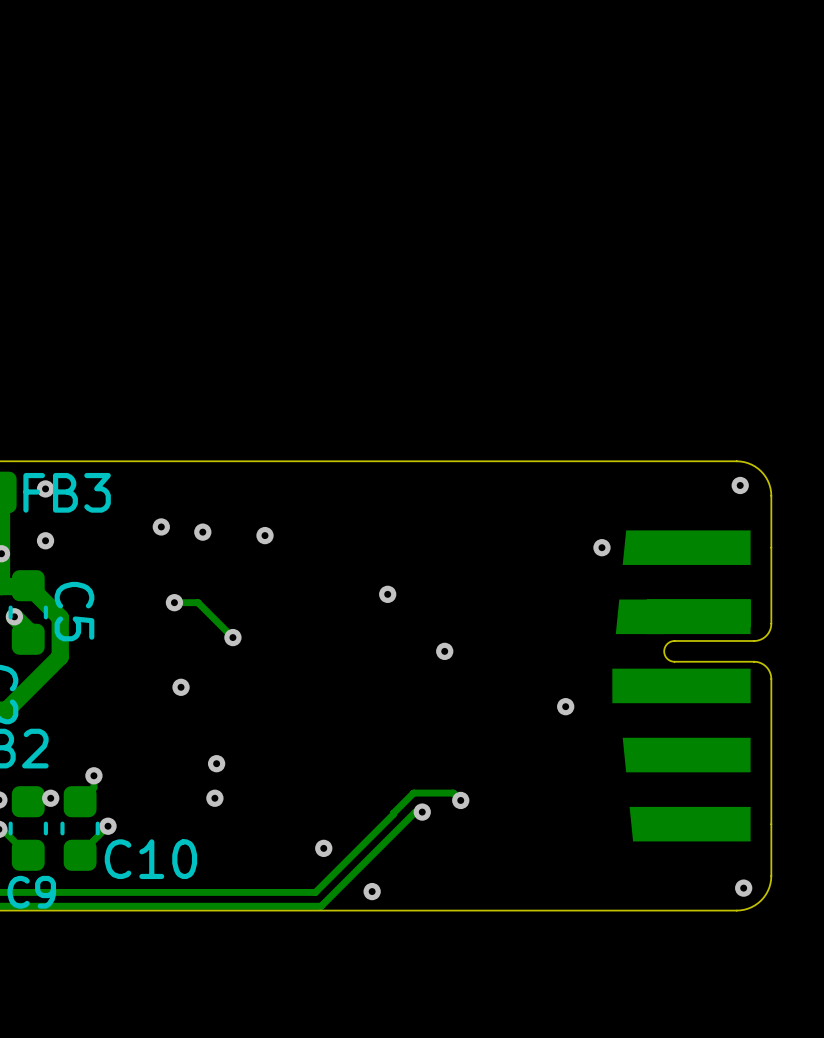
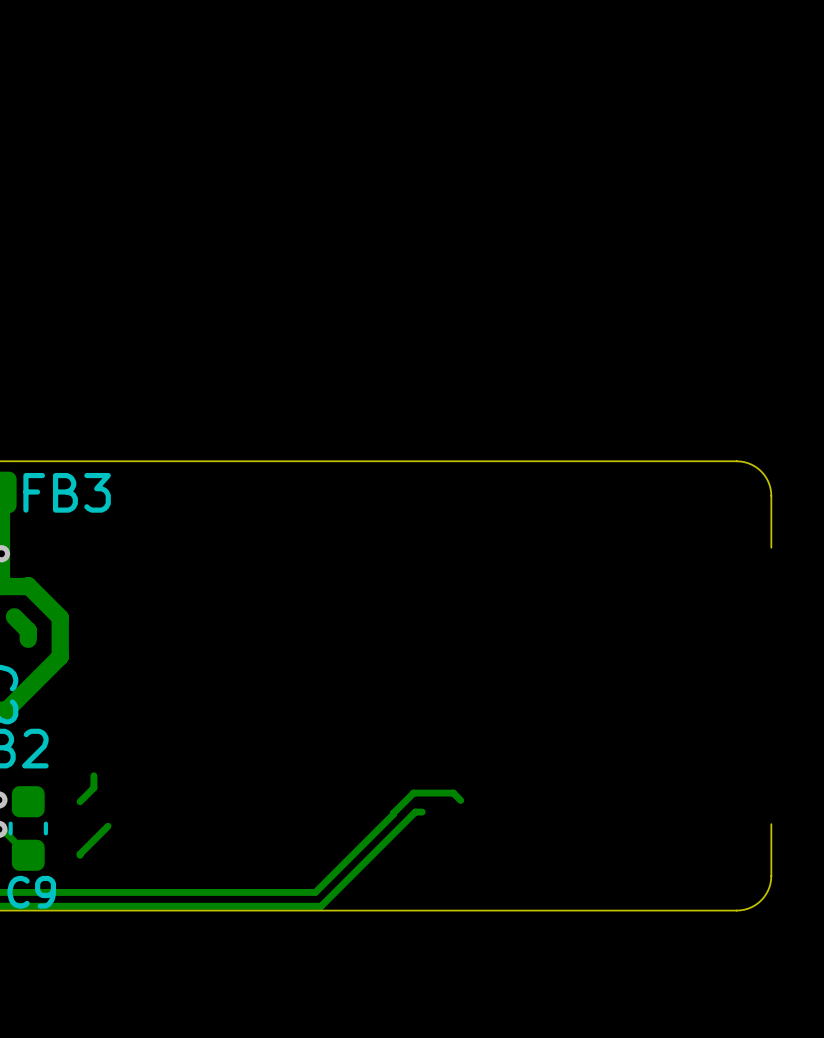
via: (740, 485) -> none
via: (45, 488) -> none
via: (161, 526) -> none
via: (202, 532) -> none
via: (265, 535) -> none
via: (45, 540) -> none
via: (601, 547) -> none
via: (387, 594) -> none
track: (174, 602) (198, 602) (232, 637) -> none
via: (174, 602) -> none
C5: (28, 612) -> none
via: (14, 616) -> none
via: (232, 637) -> none
via: (444, 651) -> none
part: (692, 685) -> none
via: (181, 687) -> none
via: (565, 706) -> none
via: (216, 763) -> none
via: (93, 775) -> none
via: (50, 798) -> none
via: (214, 798) -> none
via: (460, 800) -> none
via: (422, 812) -> none
via: (108, 826) -> none
C10: (80, 828) -> none
via: (323, 848) -> none
via: (743, 888) -> none
via: (372, 891) -> none

